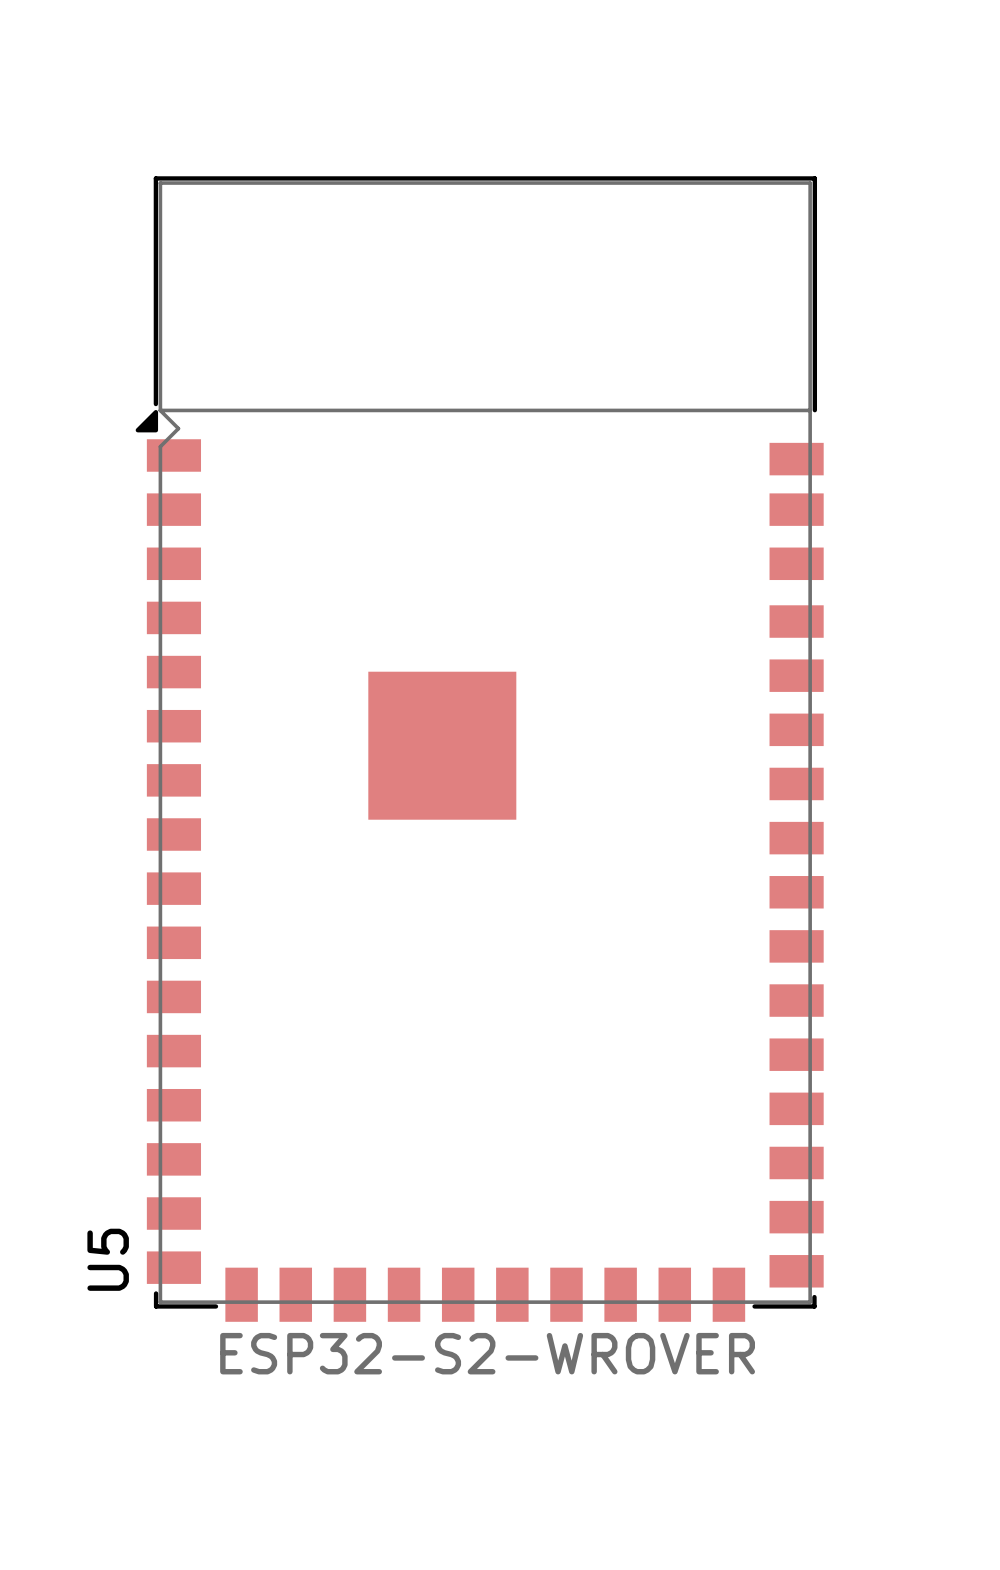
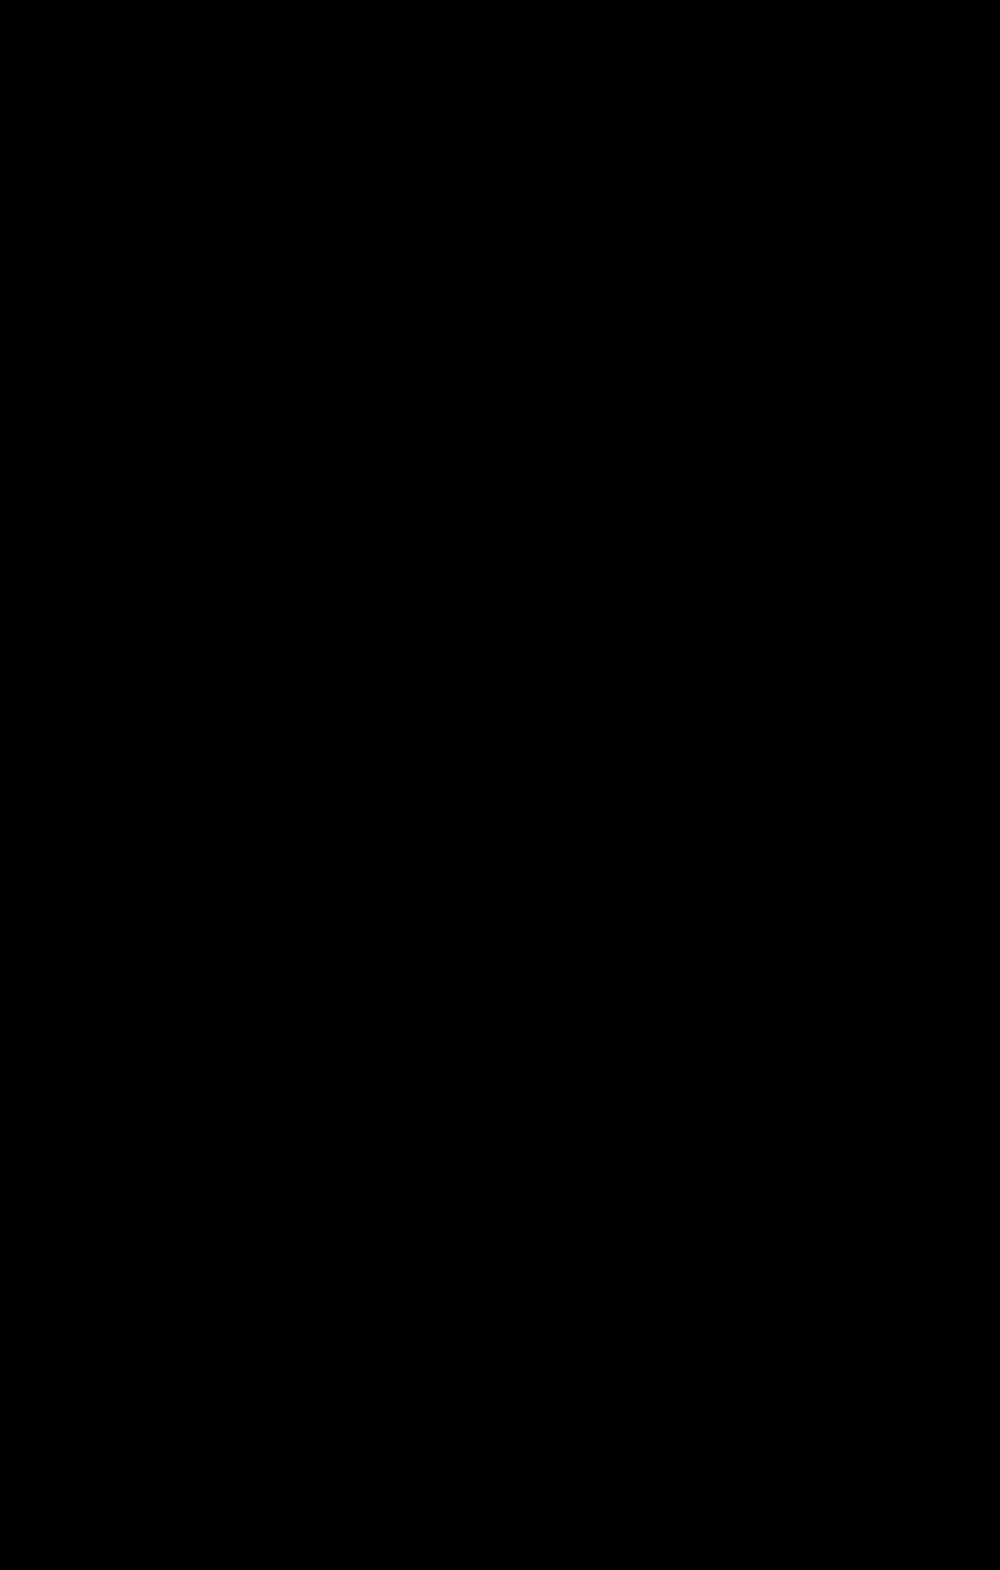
U5: ESP32-S2-WROVER (479, 749) -> none

